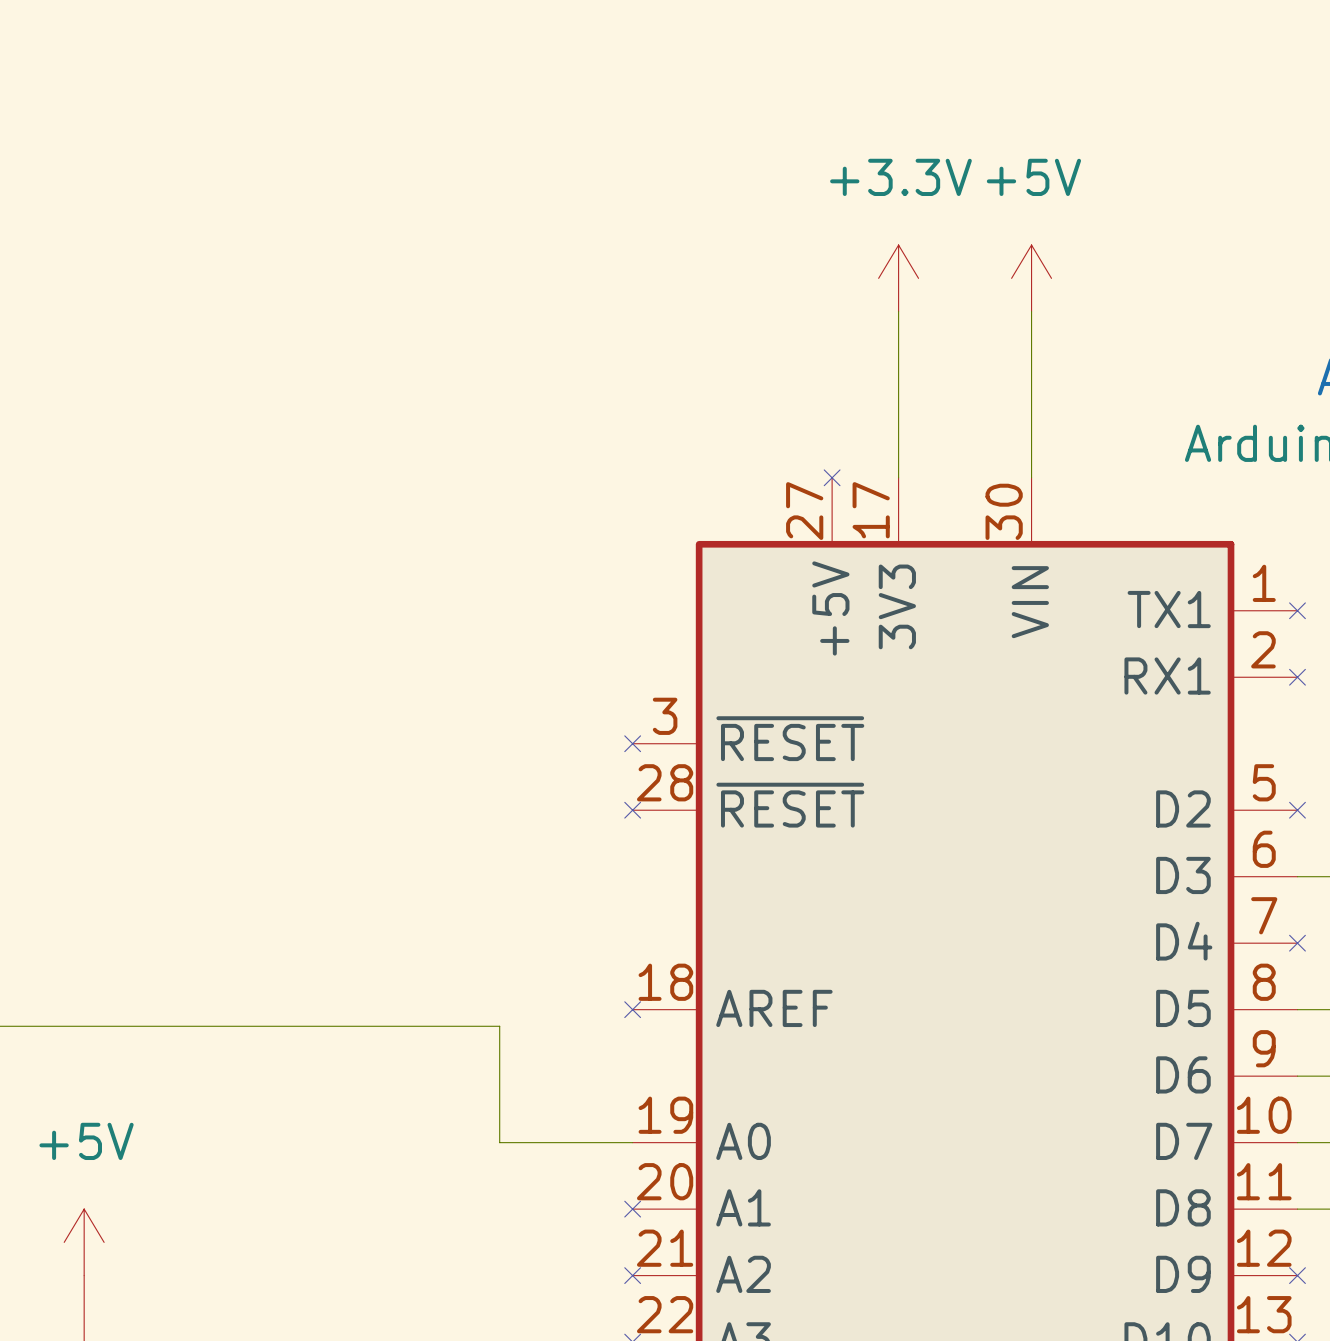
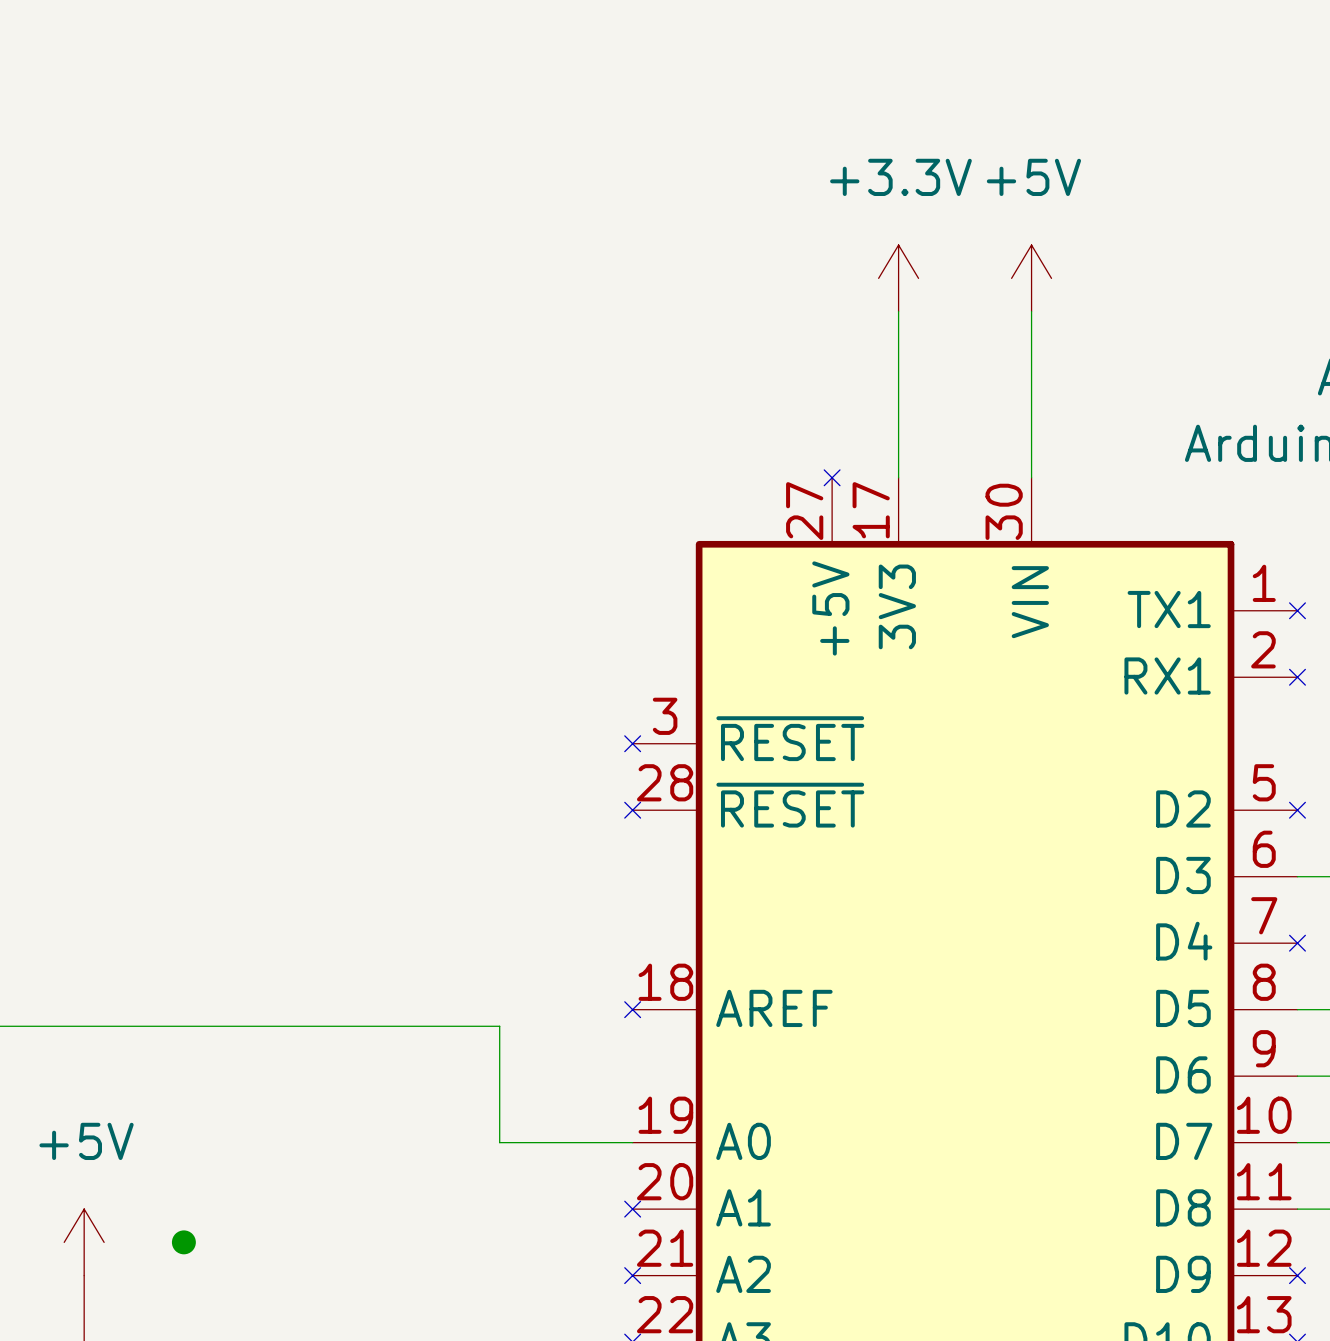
junction: none -> (183, 1242)

